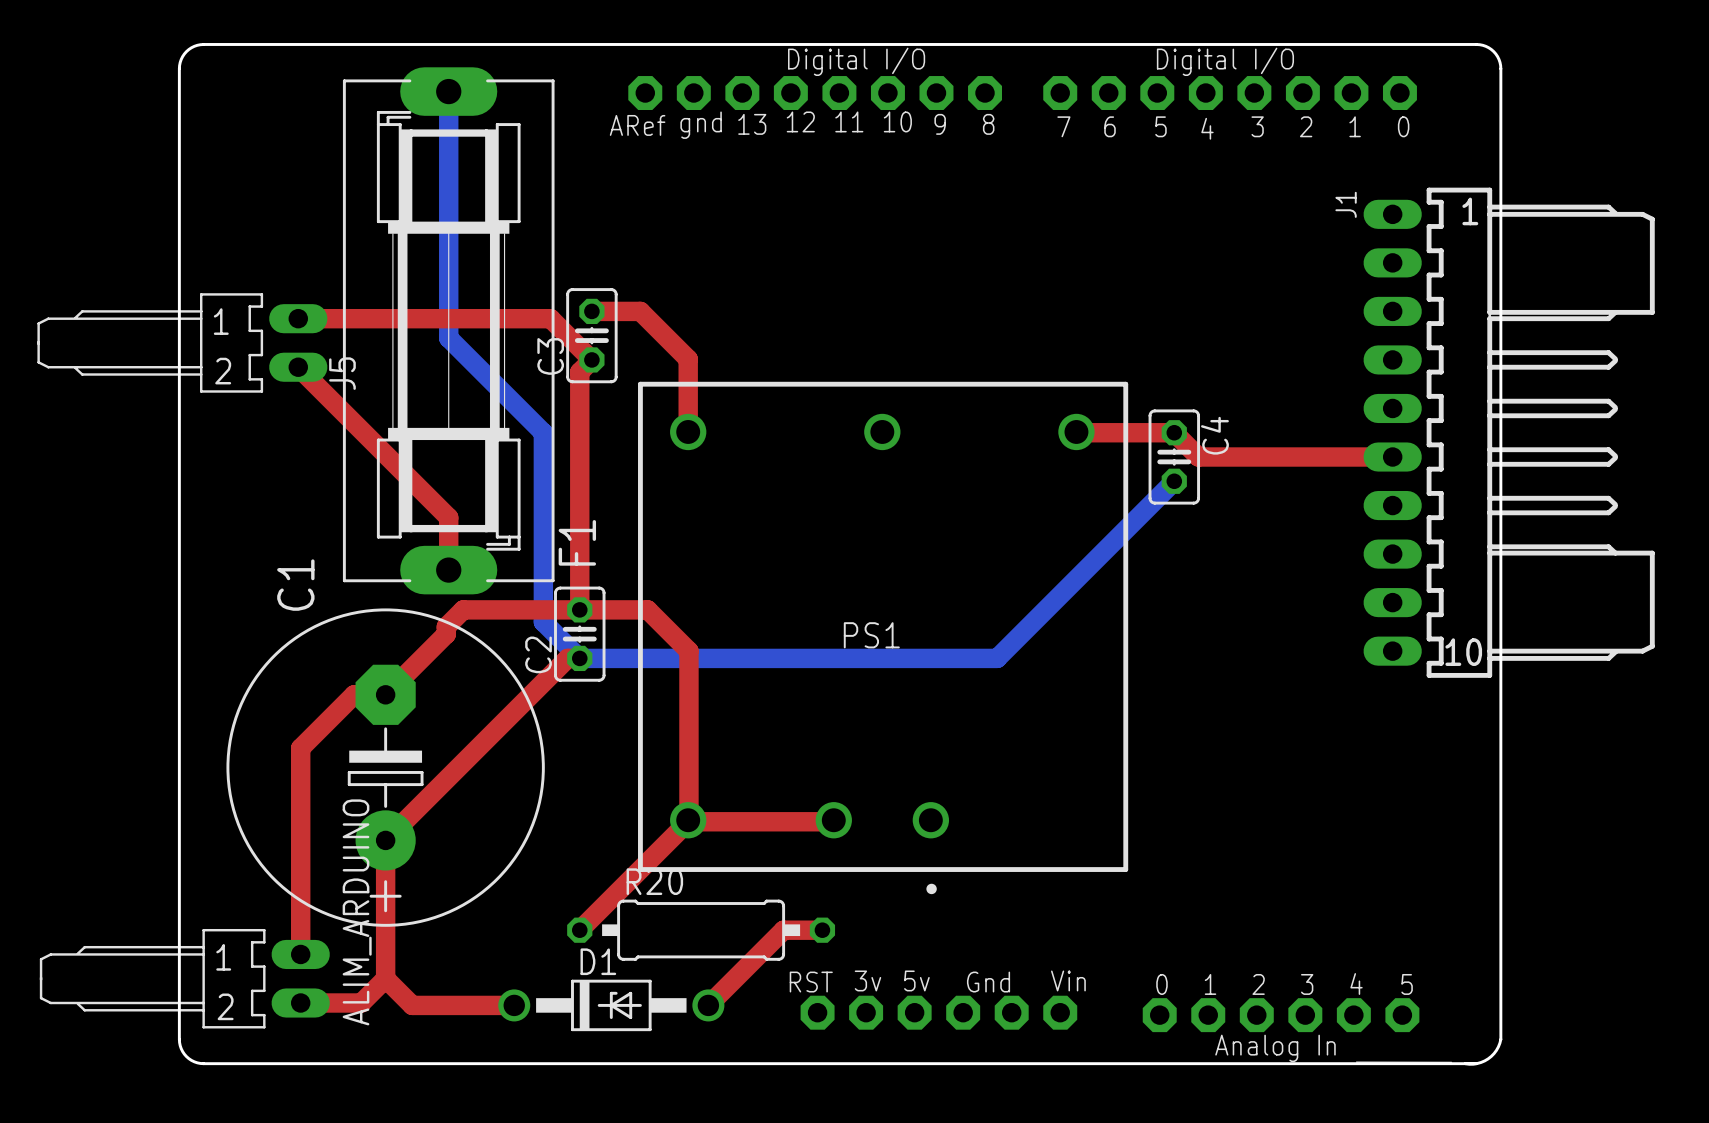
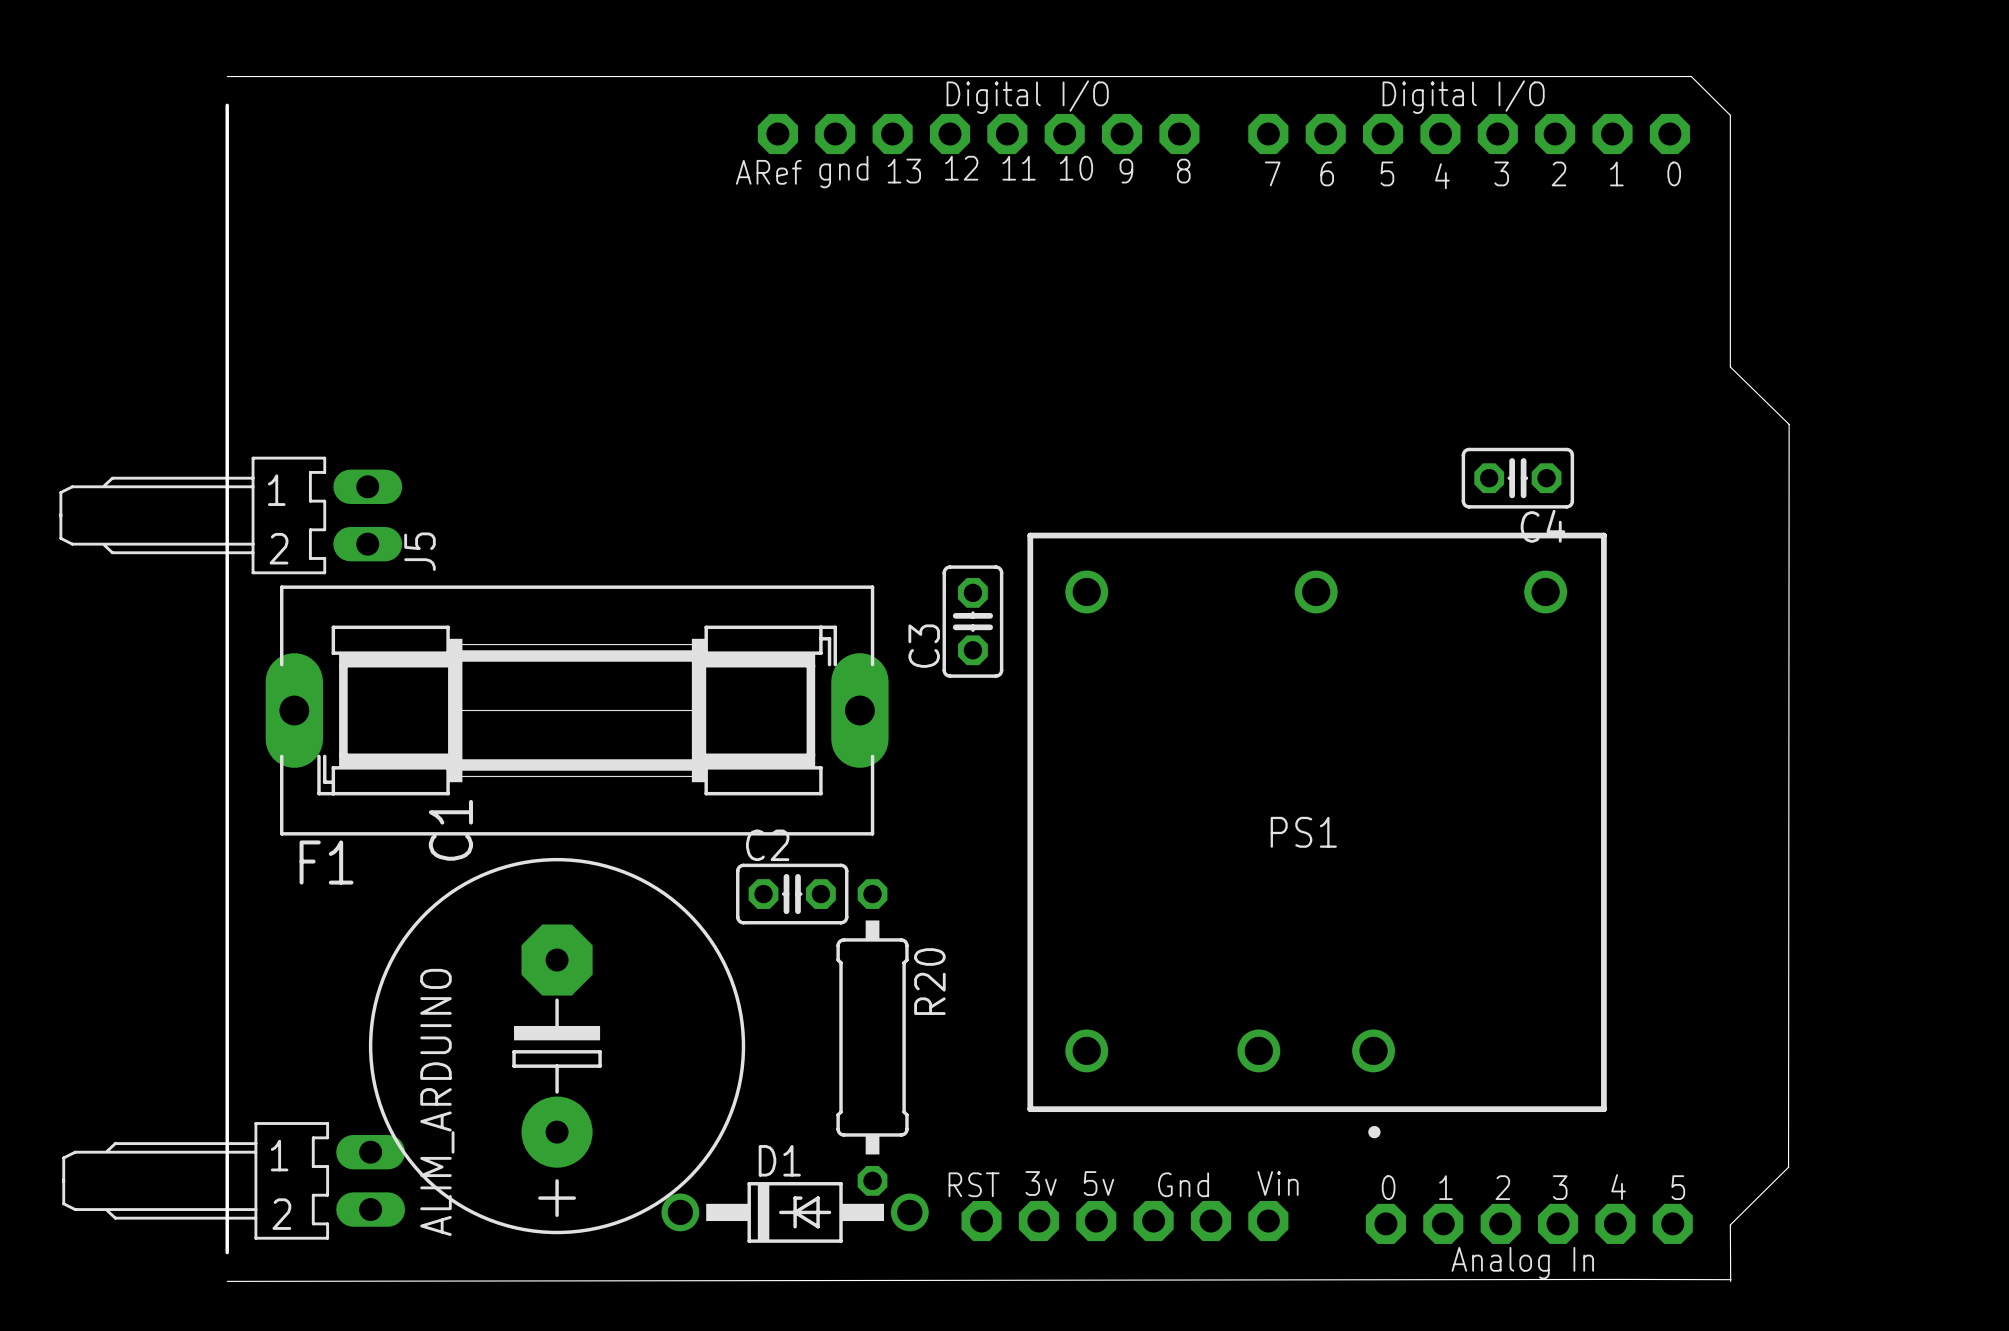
board edge: none -> (227, 76) (1691, 76) (1730, 115) (1730, 367) (1789, 424) (1788, 1167) (1730, 1224) (1730, 1281)
board edge: (179, 68) (181, 59) (186, 51) (194, 46) (203, 44) (1476, 44) (1491, 49) (1497, 56) (1500, 68) (1500, 1039) (1496, 1050) (1488, 1058) (1477, 1063) (1465, 1063) -> none
bottom track: (448, 91) (448, 338) (543, 432) (543, 622) (579, 658) (997, 658) (1174, 481) -> none
top track: (591, 311) (640, 311) (688, 359) (688, 431) -> none
top track: (298, 318) (550, 318) (591, 359) (579, 372) (579, 609) -> none
F1 rotation: 0° (448, 330) -> 90° clockwise (577, 710)
C3 position: (591, 335) -> (972, 621)
J5 position: (182, 342) -> (230, 515)
top track: (298, 367) (448, 517) (448, 570) -> none
top track: (1076, 431) (1174, 432) (1198, 457) (1392, 457) -> none
J1: (1509, 432) -> none
C4 rotation: 0° (1174, 457) -> 90° clockwise (1517, 478)
C4 position: (1174, 457) -> (1517, 478)
C2 rotation: 0° (579, 634) -> 90° clockwise (792, 894)
C2 position: (579, 634) -> (792, 894)
PS1 position: (883, 637) -> (1317, 835)
top track: (579, 658) (567, 658) (385, 840) (385, 978) -> none
C1 position: (385, 767) -> (557, 1046)
top track: (833, 820) (832, 821) (688, 821) -> none
top track: (688, 821) (579, 930) -> none
top track: (688, 821) (688, 651) (647, 609) (463, 609) (446, 626) (446, 634) (385, 694) (354, 694) (300, 748) (300, 954) -> none
R20 rotation: 0° (701, 930) -> 90° clockwise (872, 1037)
top track: (822, 930) (783, 930) (708, 1005) -> none
top track: (385, 978) (361, 1003) (300, 1003) -> none
top track: (385, 978) (412, 1005) (514, 1005) -> none
D1 position: (611, 1005) -> (795, 1212)
board edge: (179, 1039) (181, 1048) (186, 1056) (194, 1061) (203, 1063) (1476, 1063) -> none
board edge: none -> (1618, 1279) (227, 1281)

